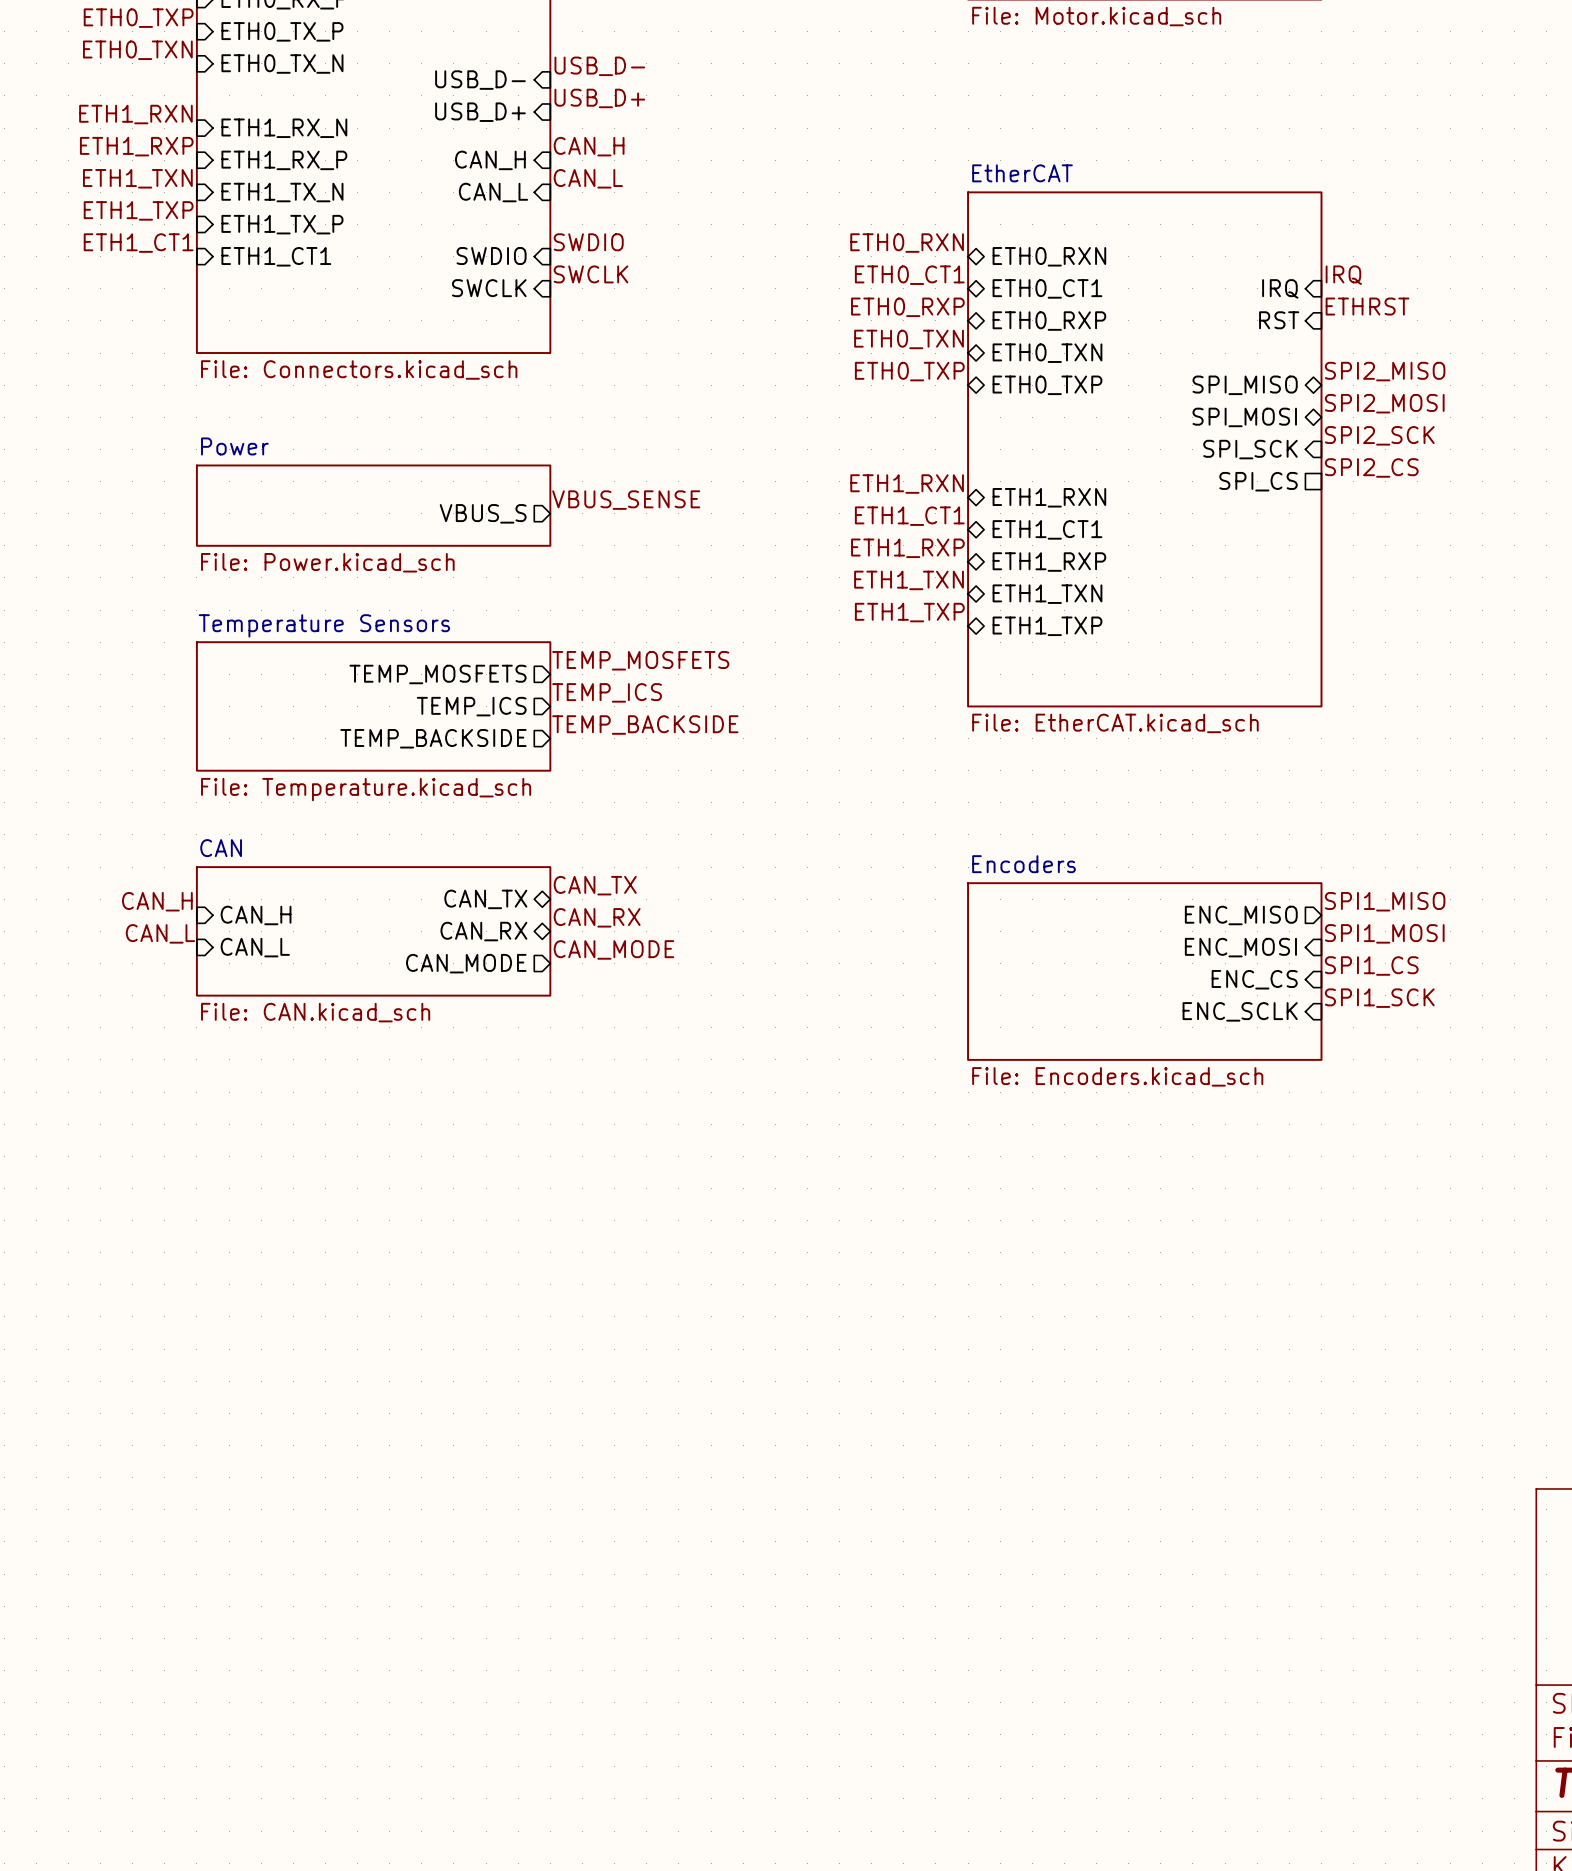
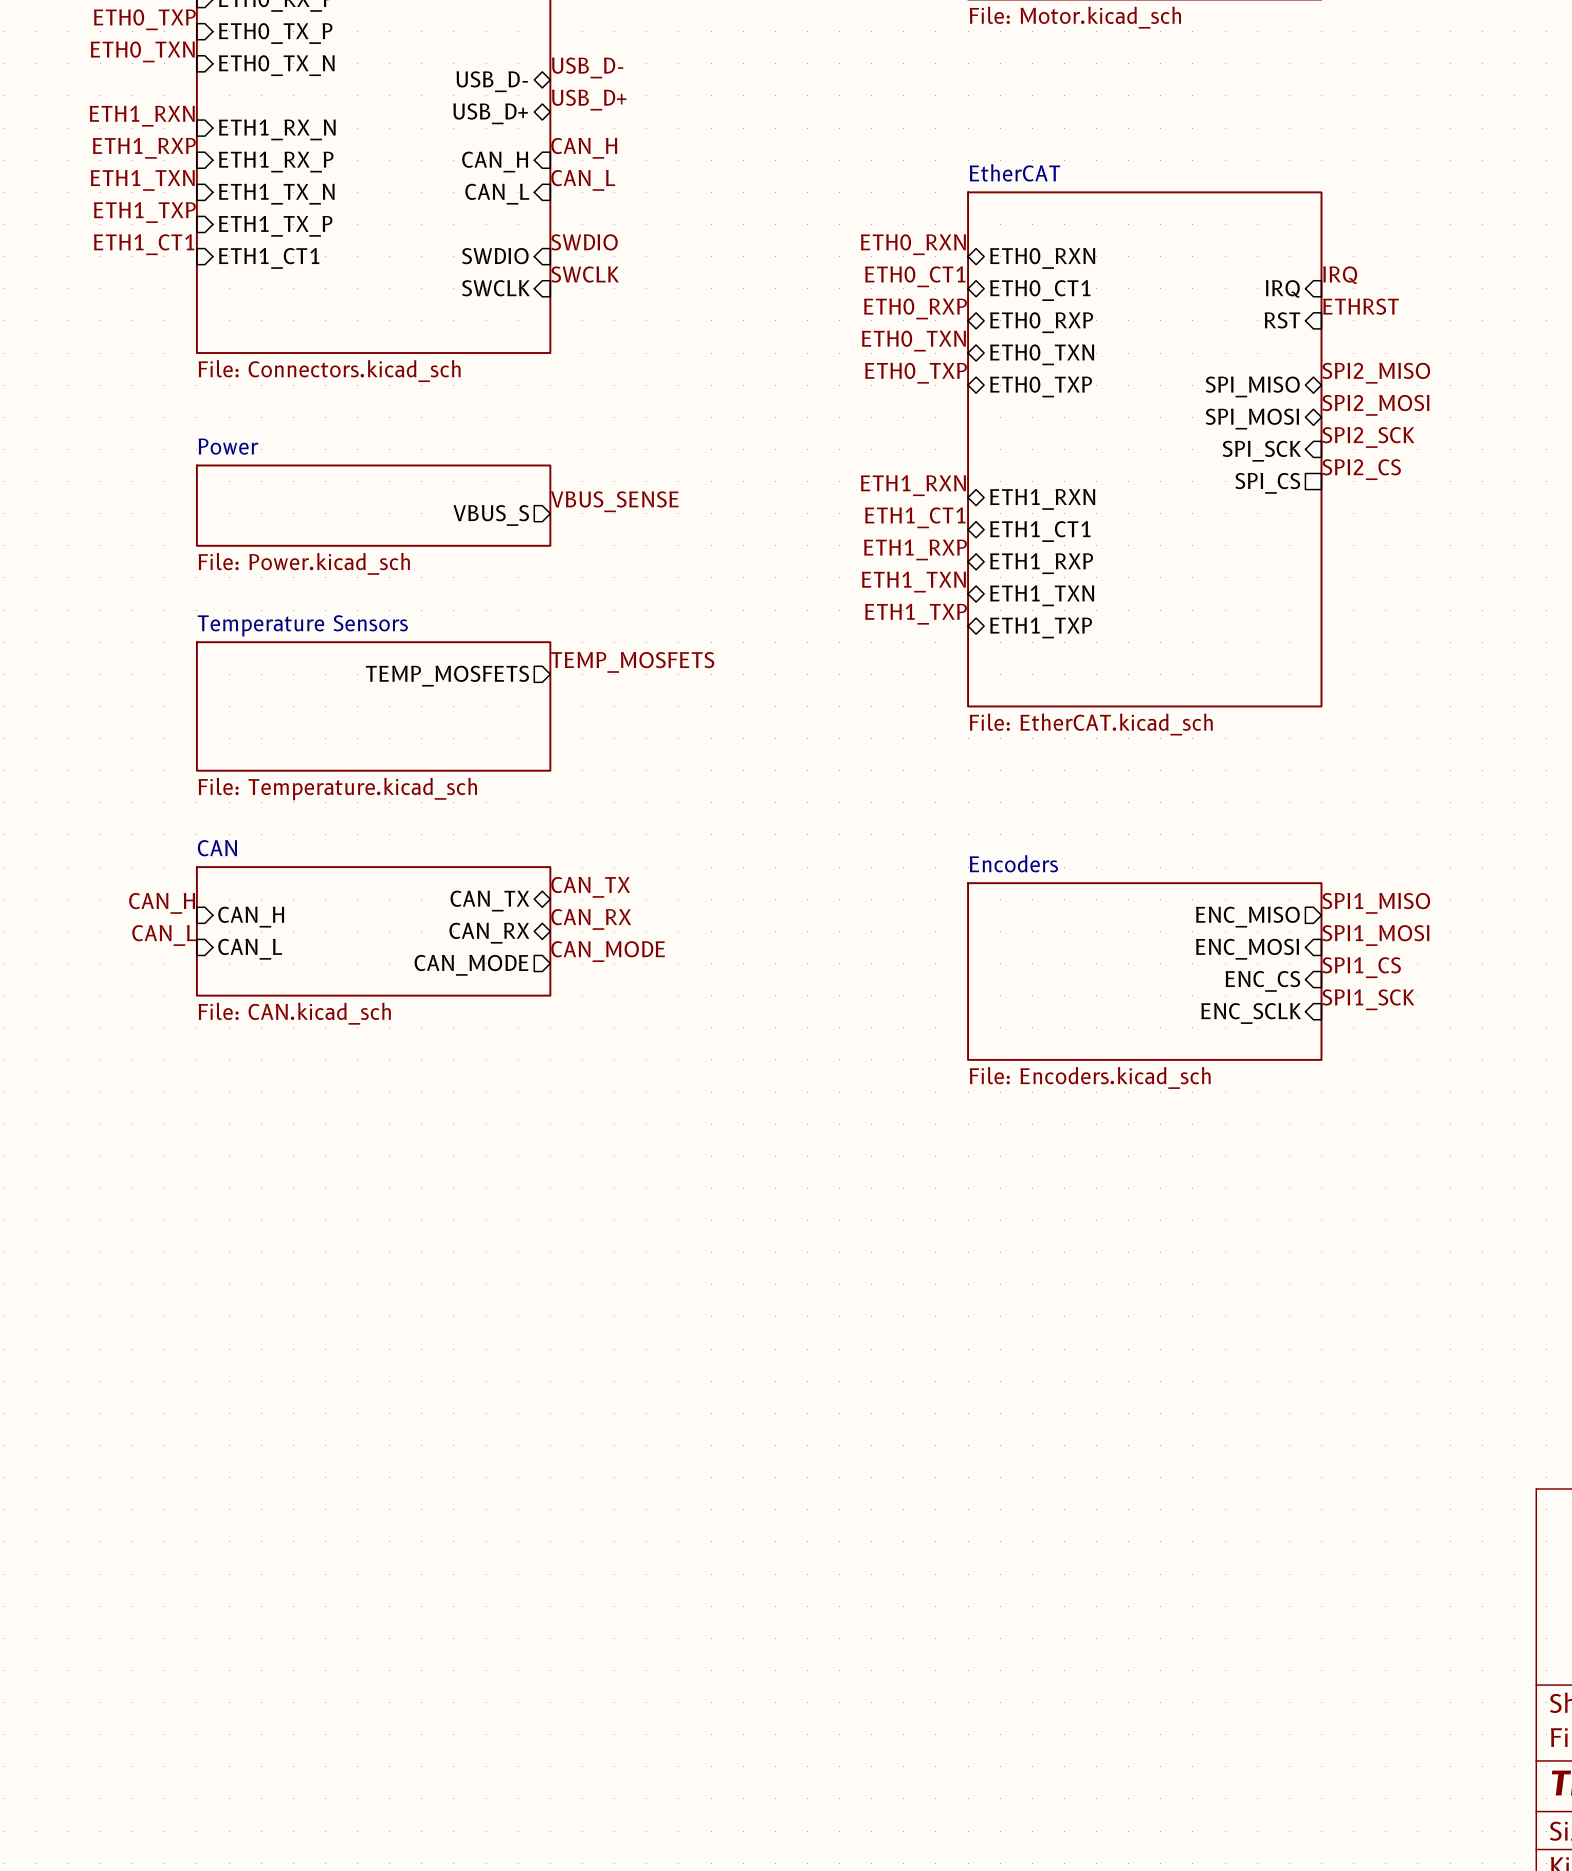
sheet pin shape: input (480, 80) -> bidirectional (492, 81)
sheet pin shape: input (480, 112) -> bidirectional (490, 113)
label: TEMP_ICS (607, 692) -> none
sheet pin: TEMP_ICS (471, 706) -> none
label: TEMP_BACKSIDE (645, 725) -> none
sheet pin: TEMP_BACKSIDE (433, 738) -> none

